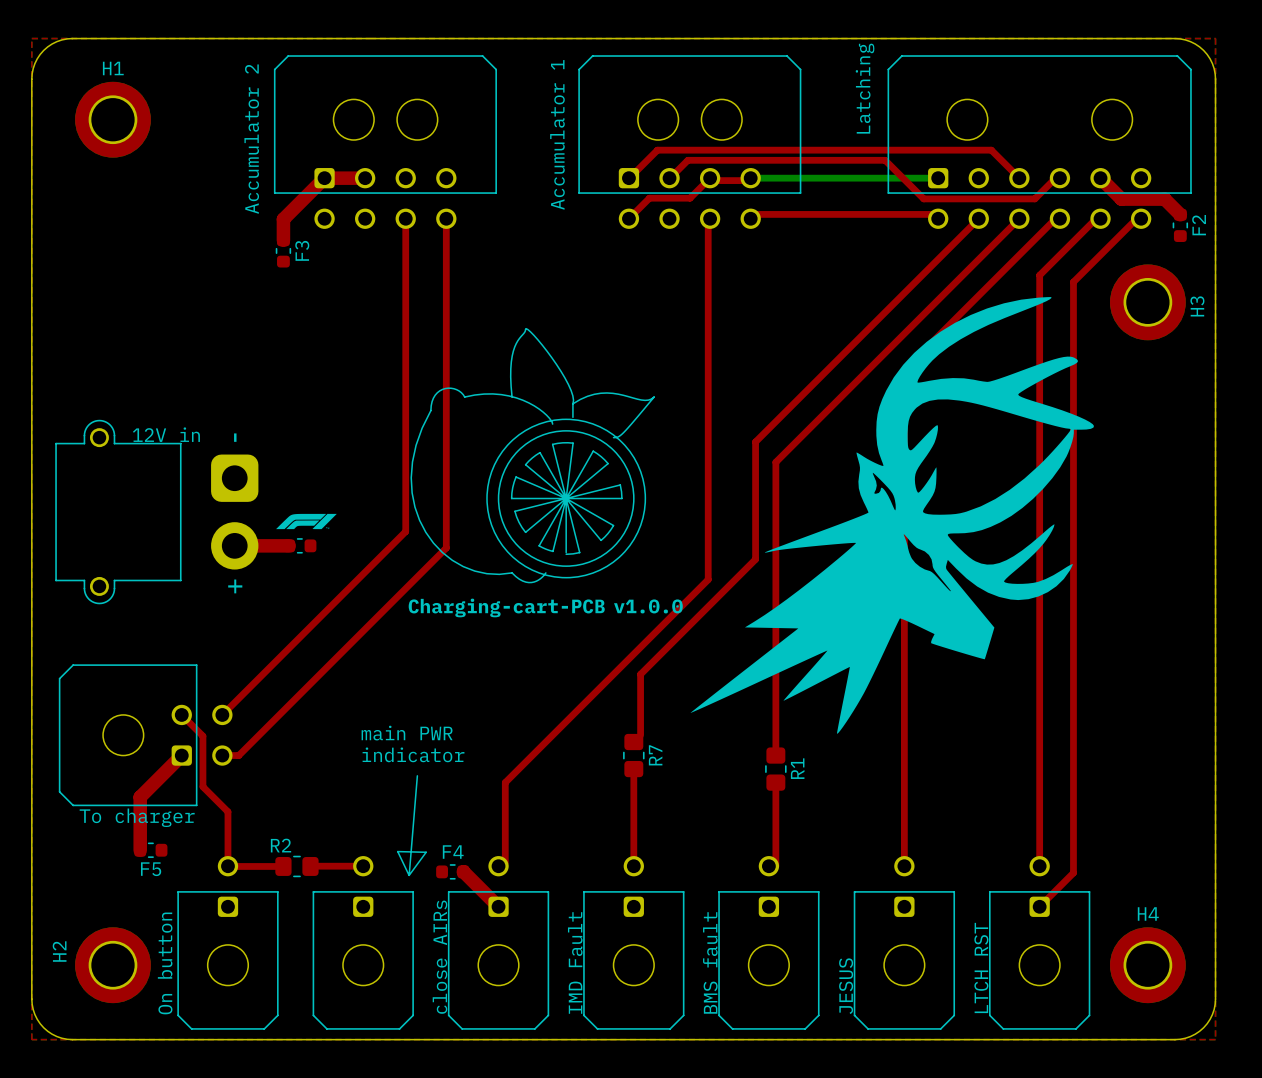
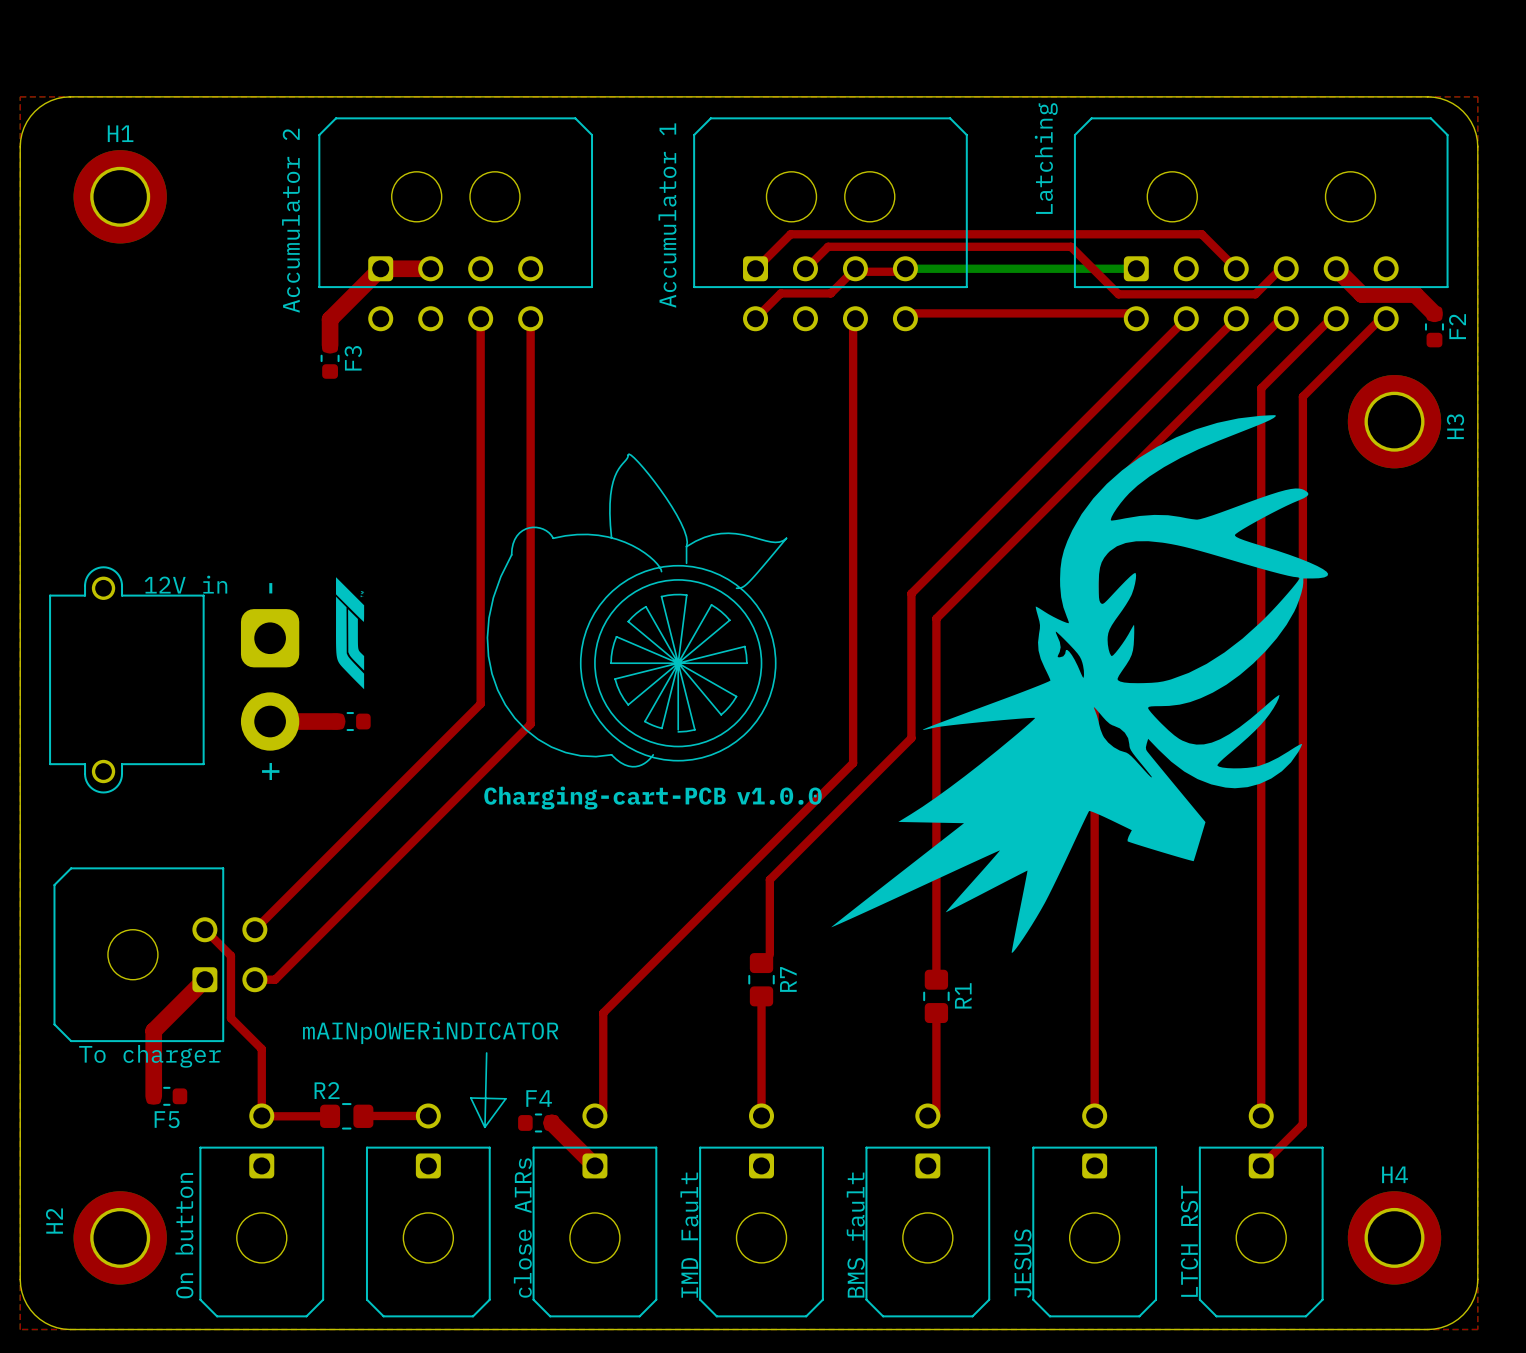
drawing: none -> [336, 577, 365, 690]
drawing: [276, 513, 337, 530] -> none
text: main PWR (407, 733) -> none
text: indicator (413, 754) -> none
line: (417, 775) (409, 874) -> (486, 1053) (484, 1126)
text: none -> mAINpOWERiNDICATOR (430, 1032)

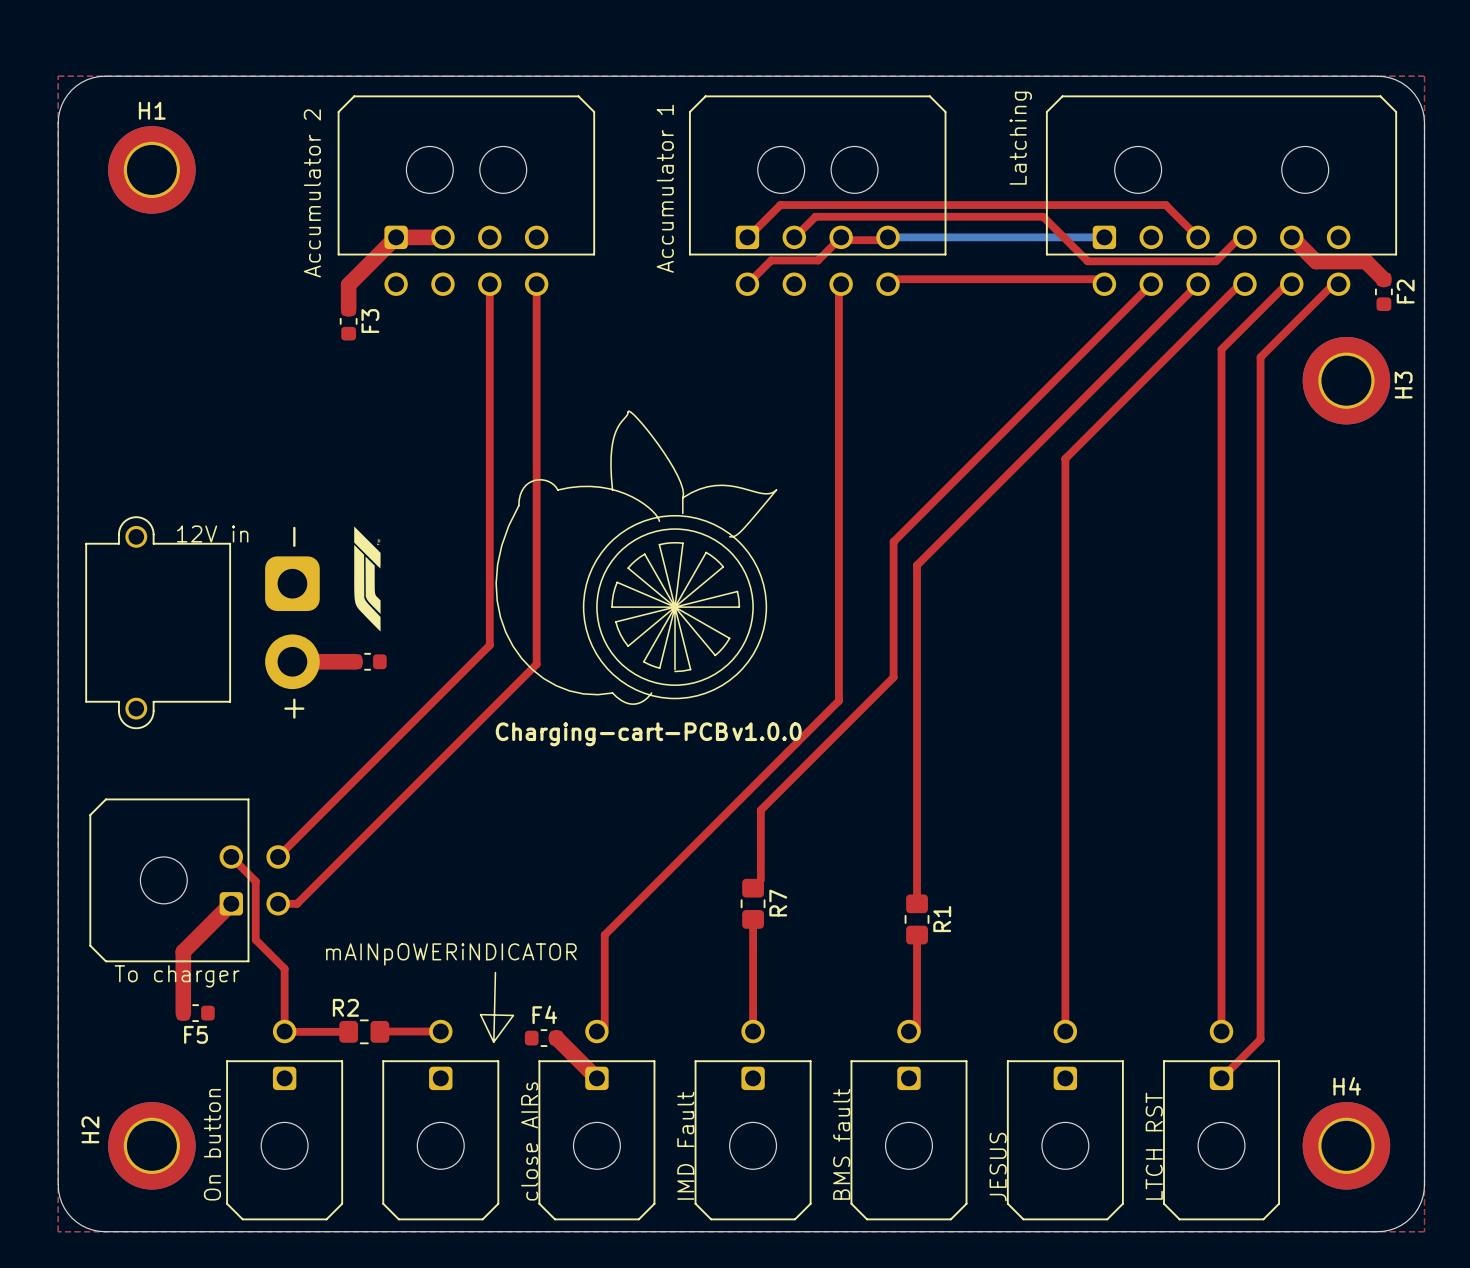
drawing: [831, 415, 1329, 953] -> none

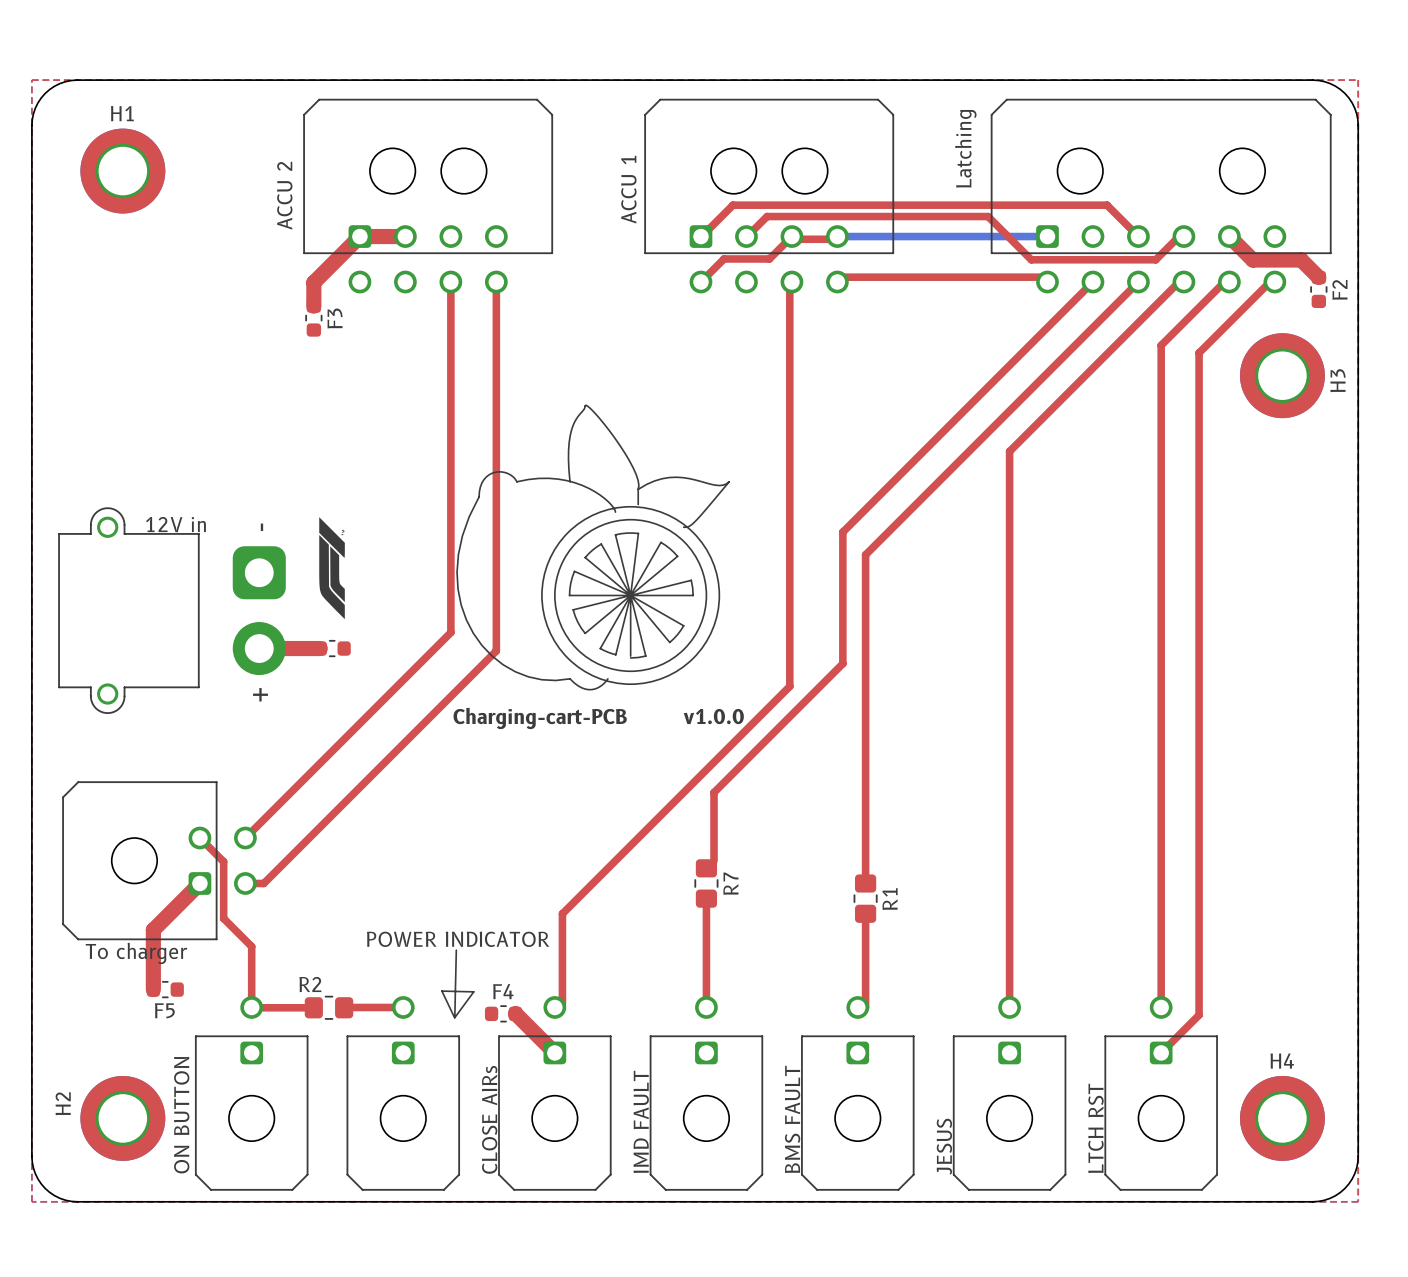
text: none -> ACCU 1 (628, 189)
text: none -> ACCU 2 (284, 195)
text: Accumulator 1 (665, 188) -> none
text: Accumulator 2 (312, 193) -> none
text: mAINpOWERiNDICATOR (451, 954) -> POWER INDICATOR (458, 939)
text: close AIRs (529, 1141) -> CLOSE AIRs (489, 1119)
text: On button (212, 1144) -> ON BUTTON (181, 1115)
text: BMS fault (841, 1144) -> BMS FAULT (792, 1119)
text: IMD Fault (685, 1145) -> IMD FAULT (641, 1121)

